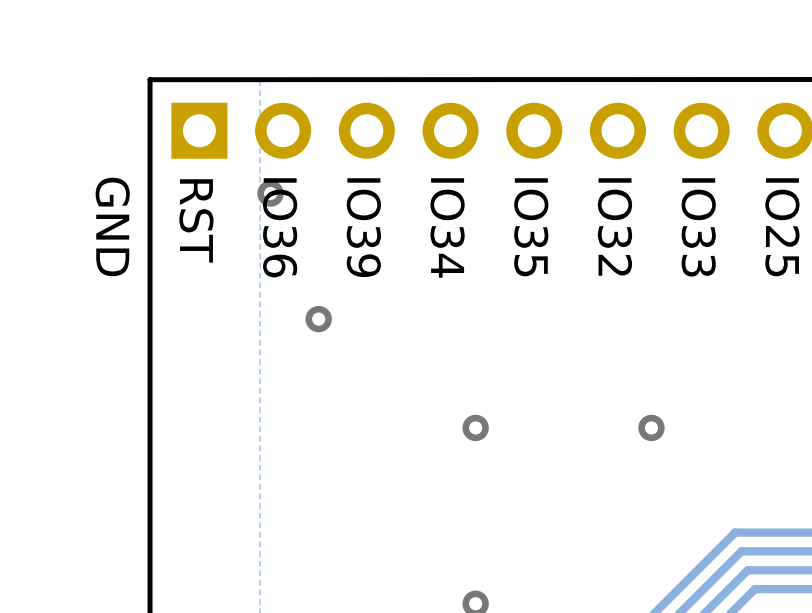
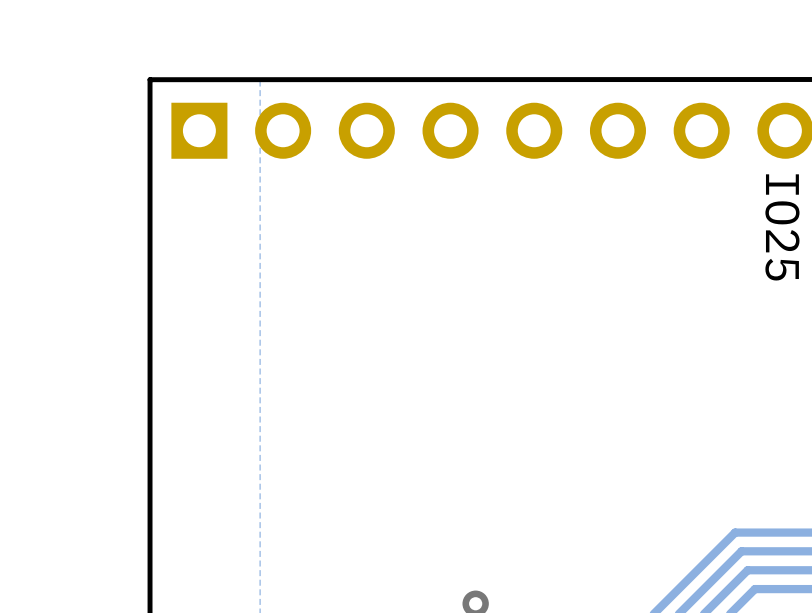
via: (270, 193) -> none
text: RST (196, 220) -> none
text: GND (112, 226) -> none
text: IO32 (614, 226) -> none
text: IO36 (280, 227) -> none
text: IO39 (363, 227) -> none
text: IO34 (447, 227) -> none
text: IO35 (531, 227) -> none
text: IO33 (698, 227) -> none
via: (318, 319) -> none
via: (475, 427) -> none
via: (651, 427) -> none

